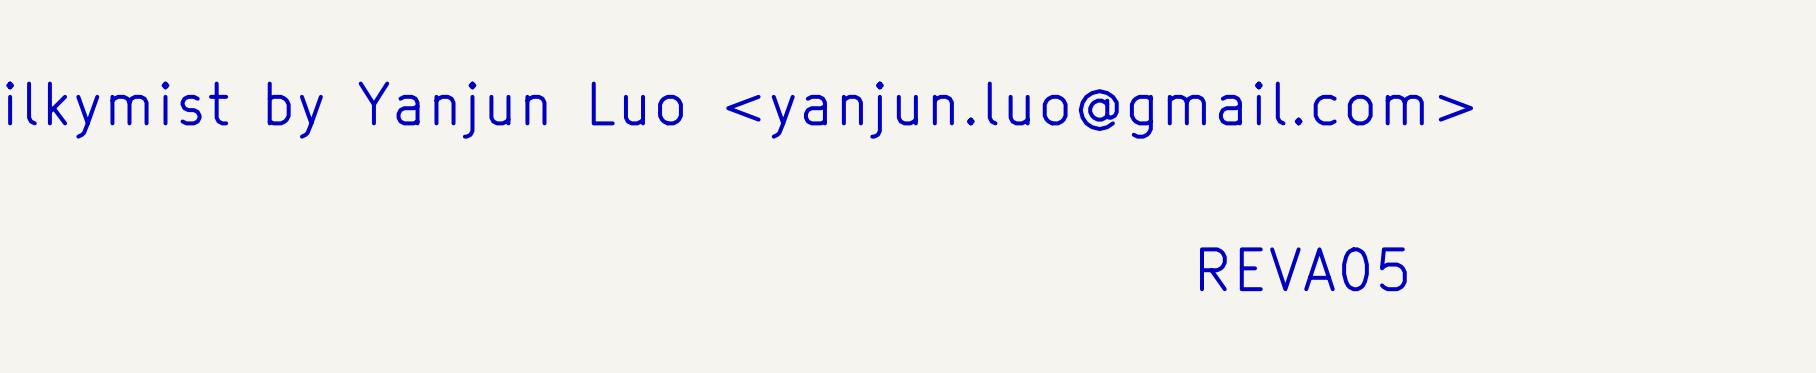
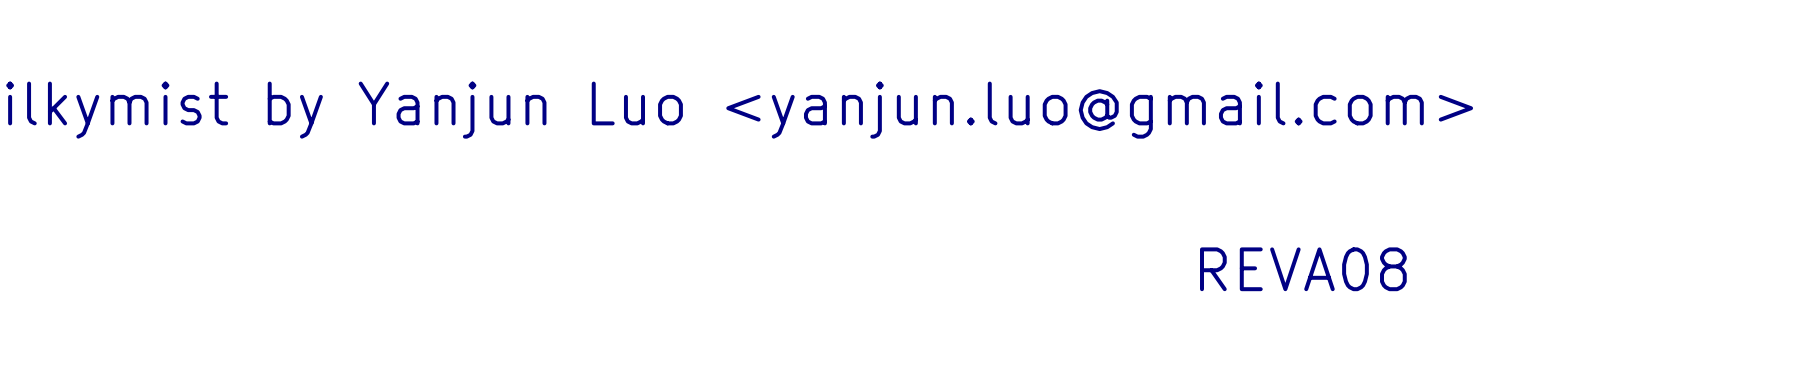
text: REVA05 (1303, 269) -> REVA08 (1303, 269)

